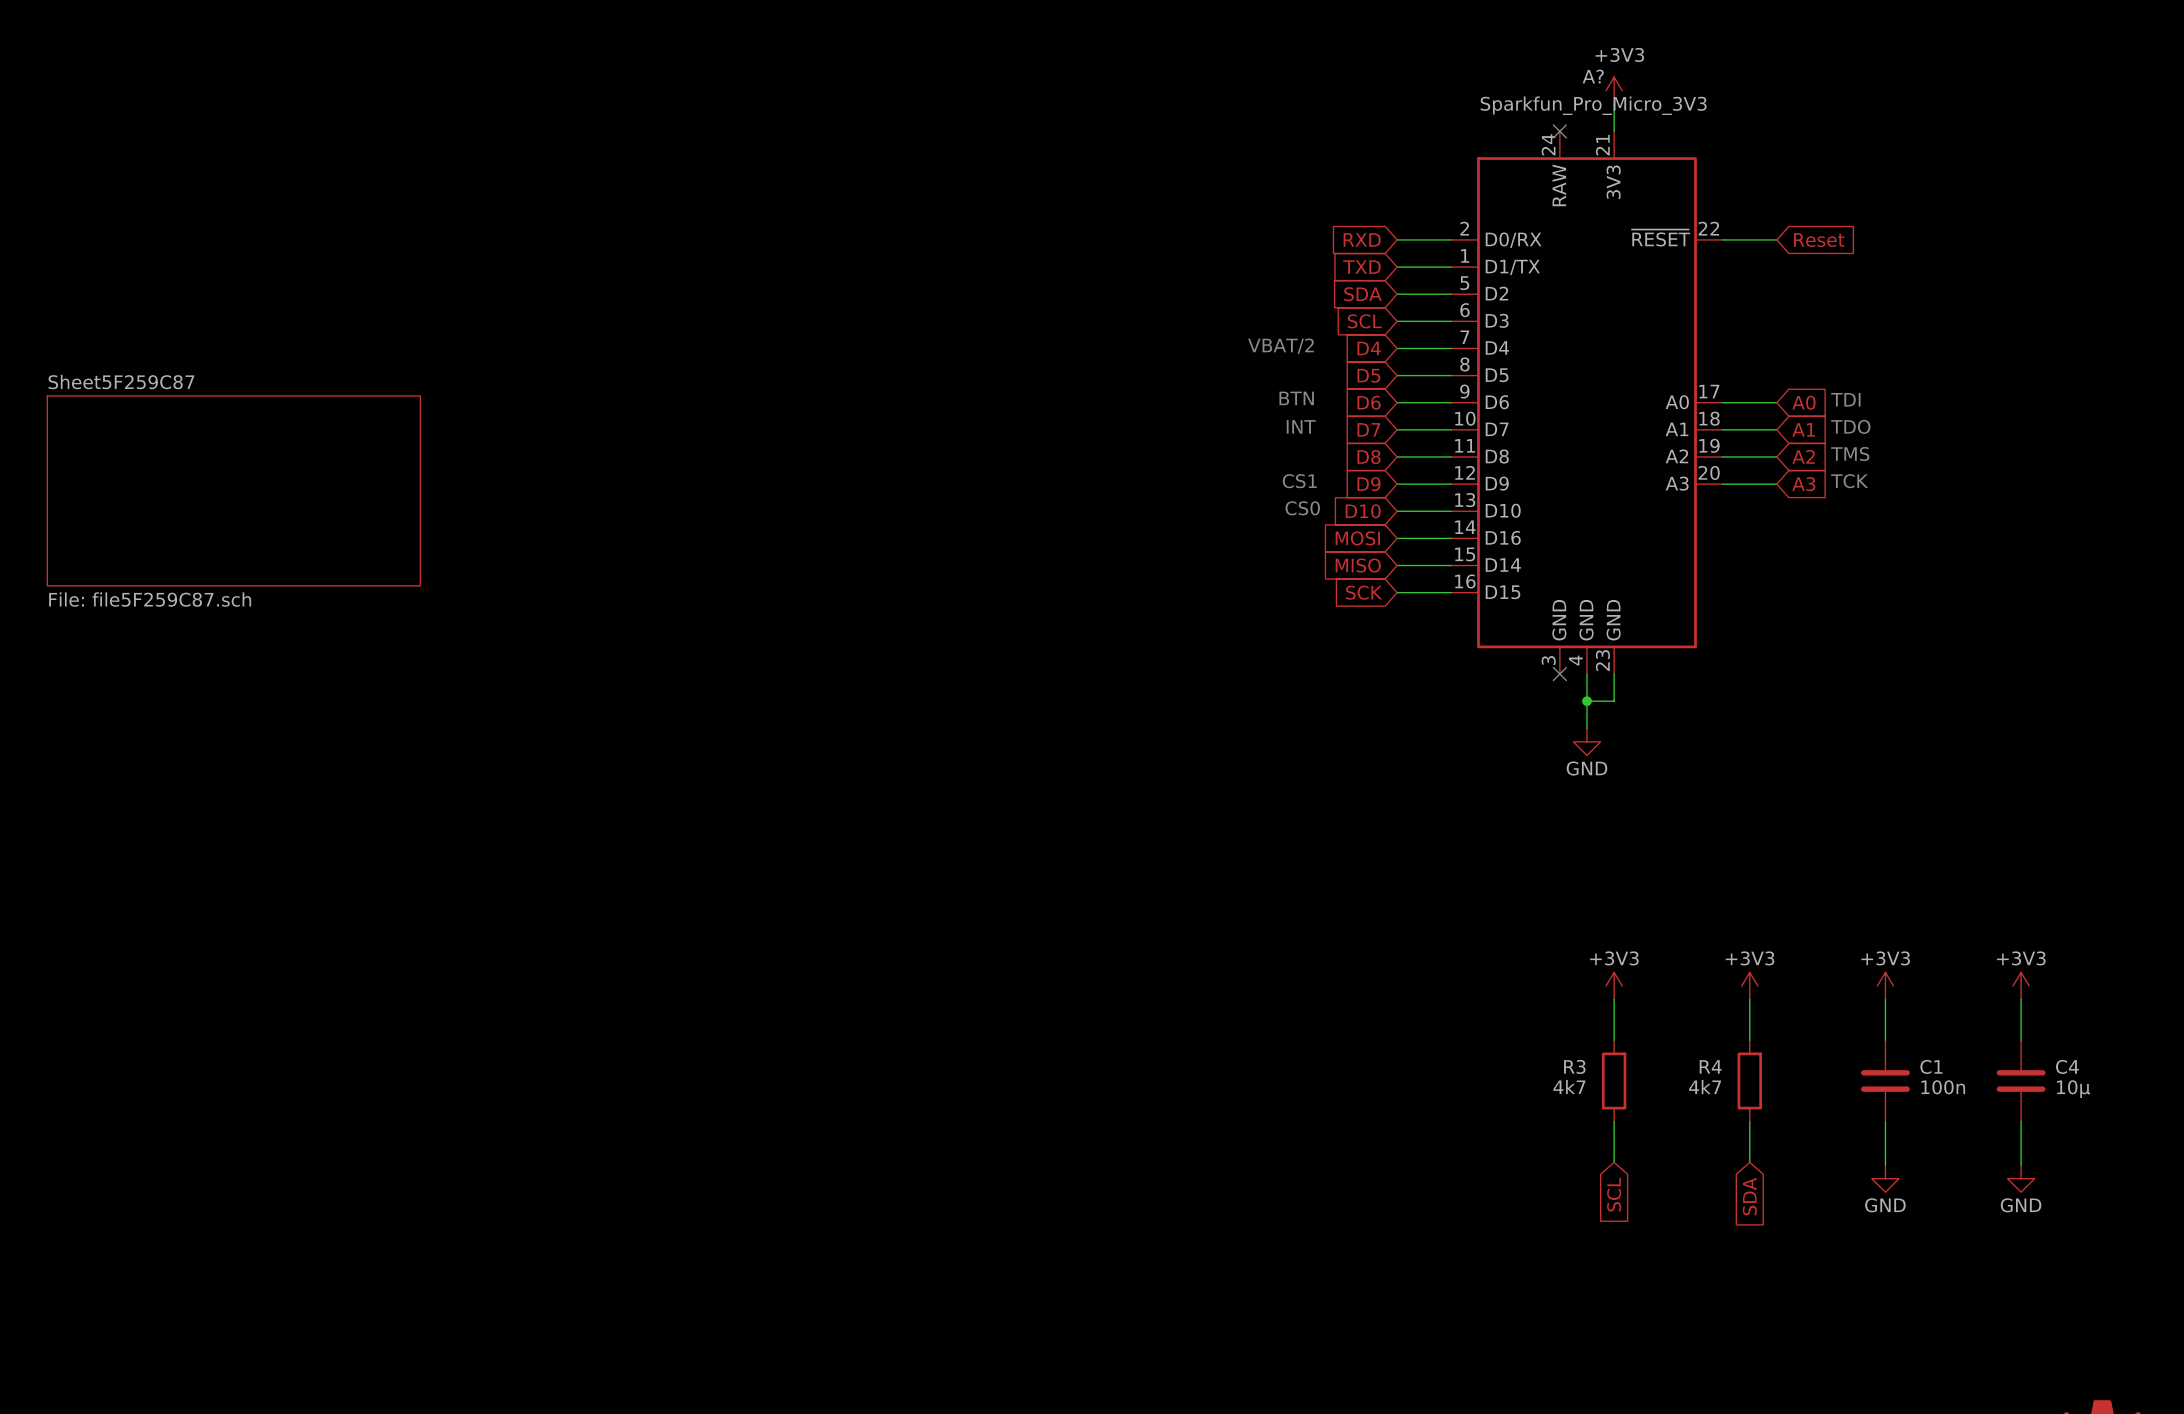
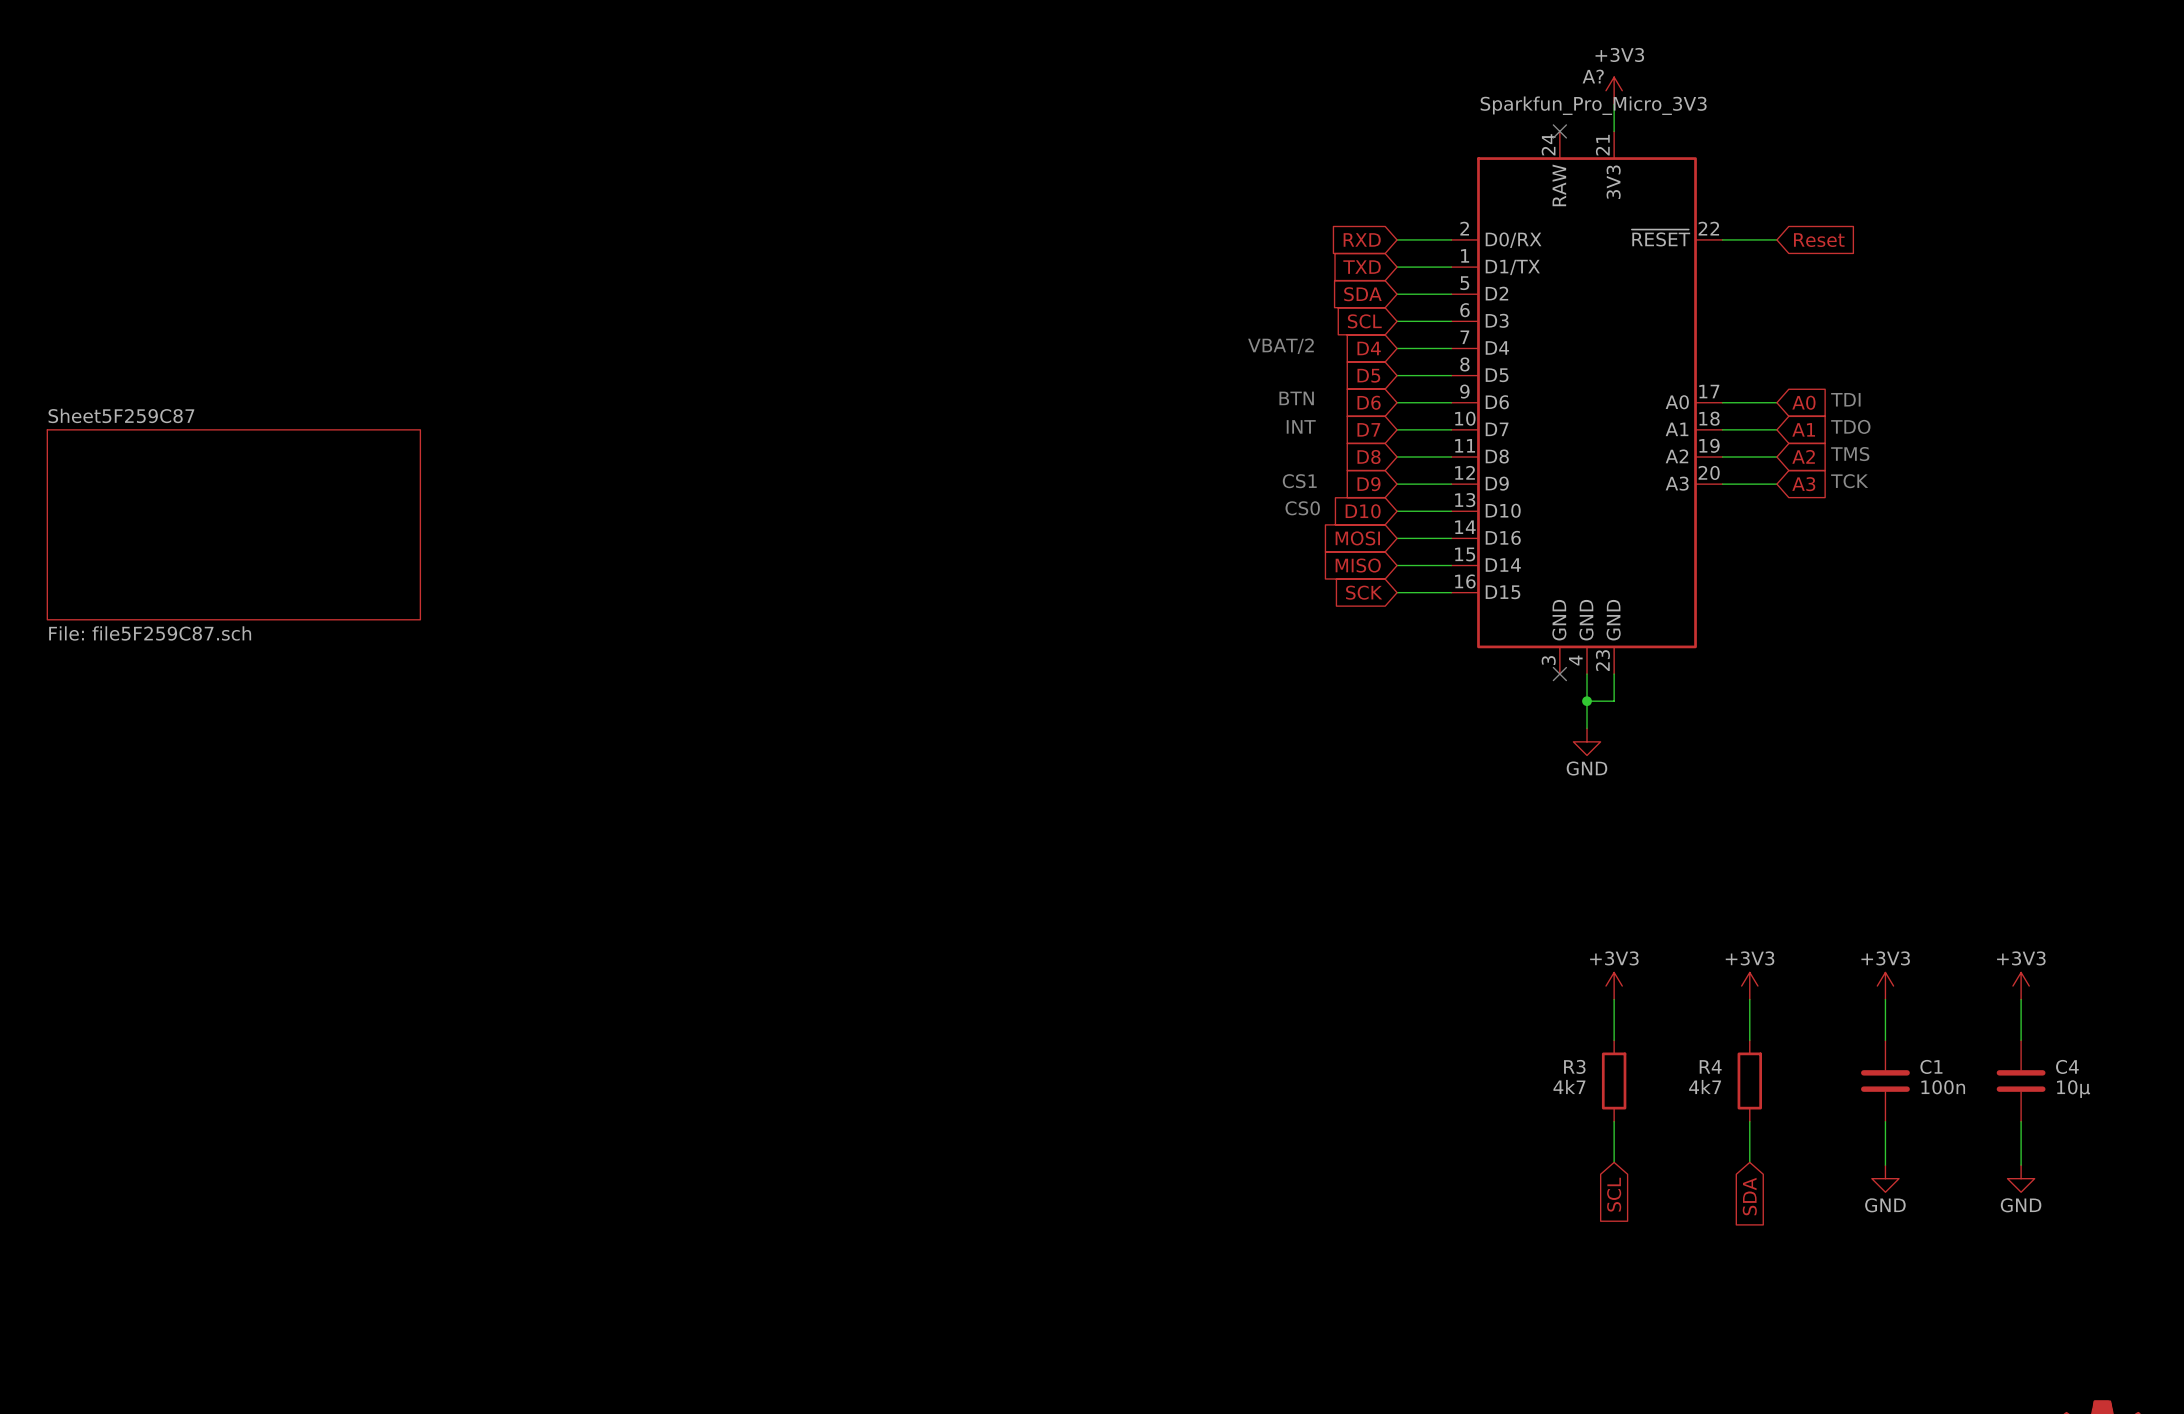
sheet Sheet5F259C87 position: (233, 490) -> (233, 524)

